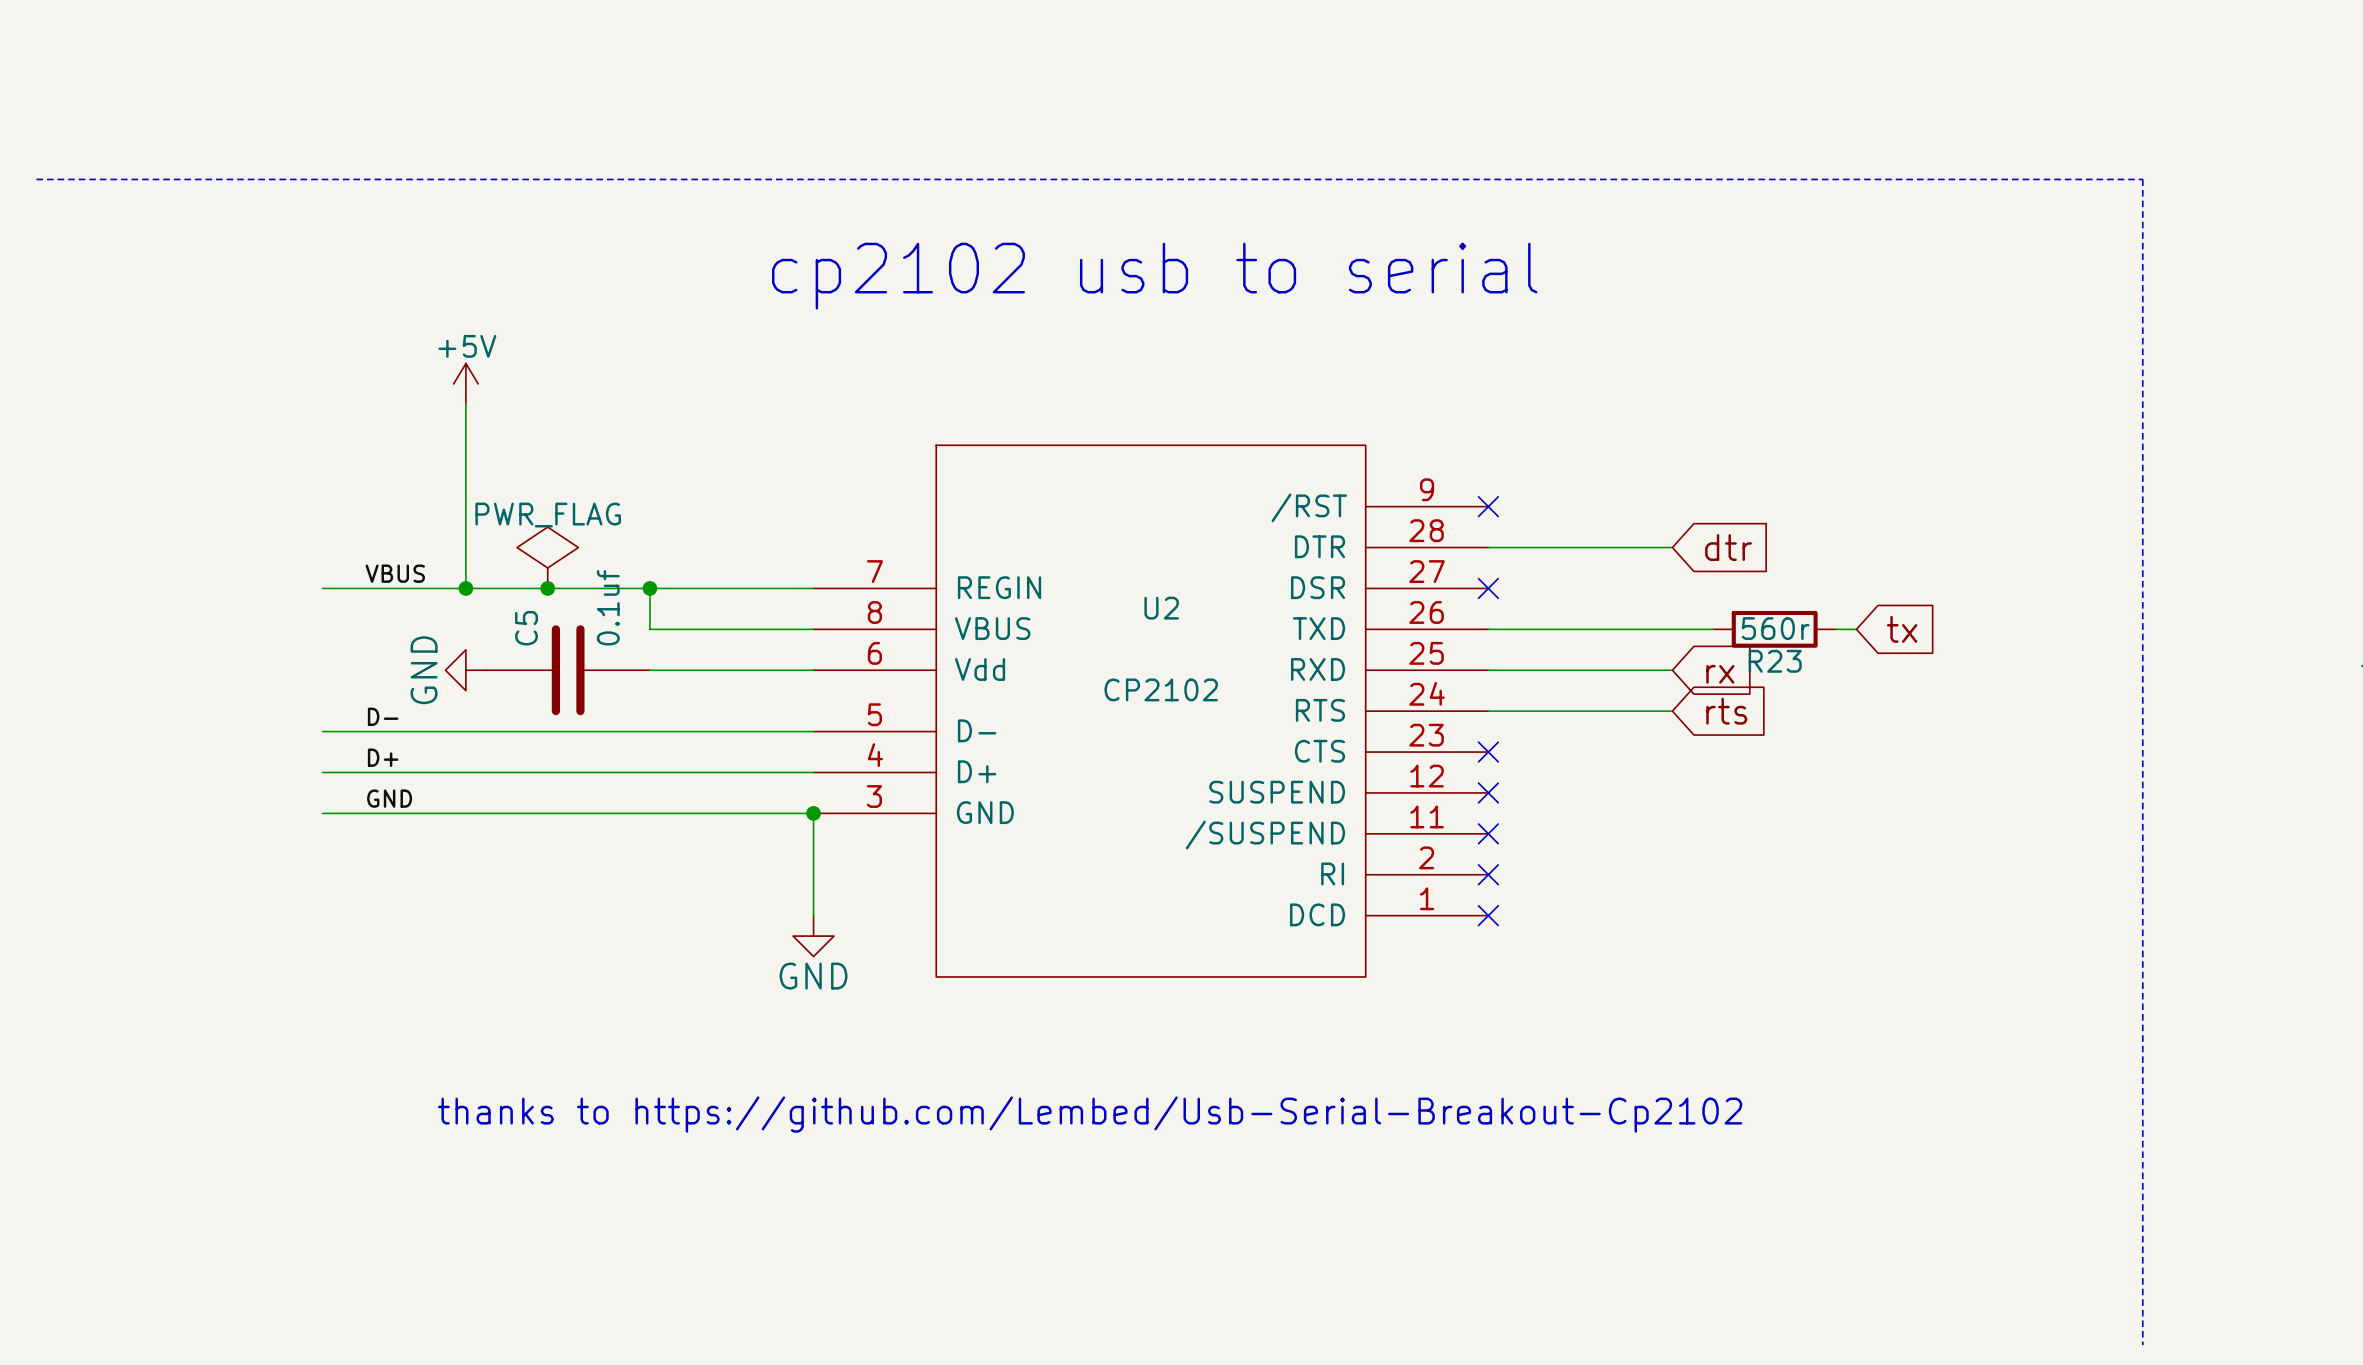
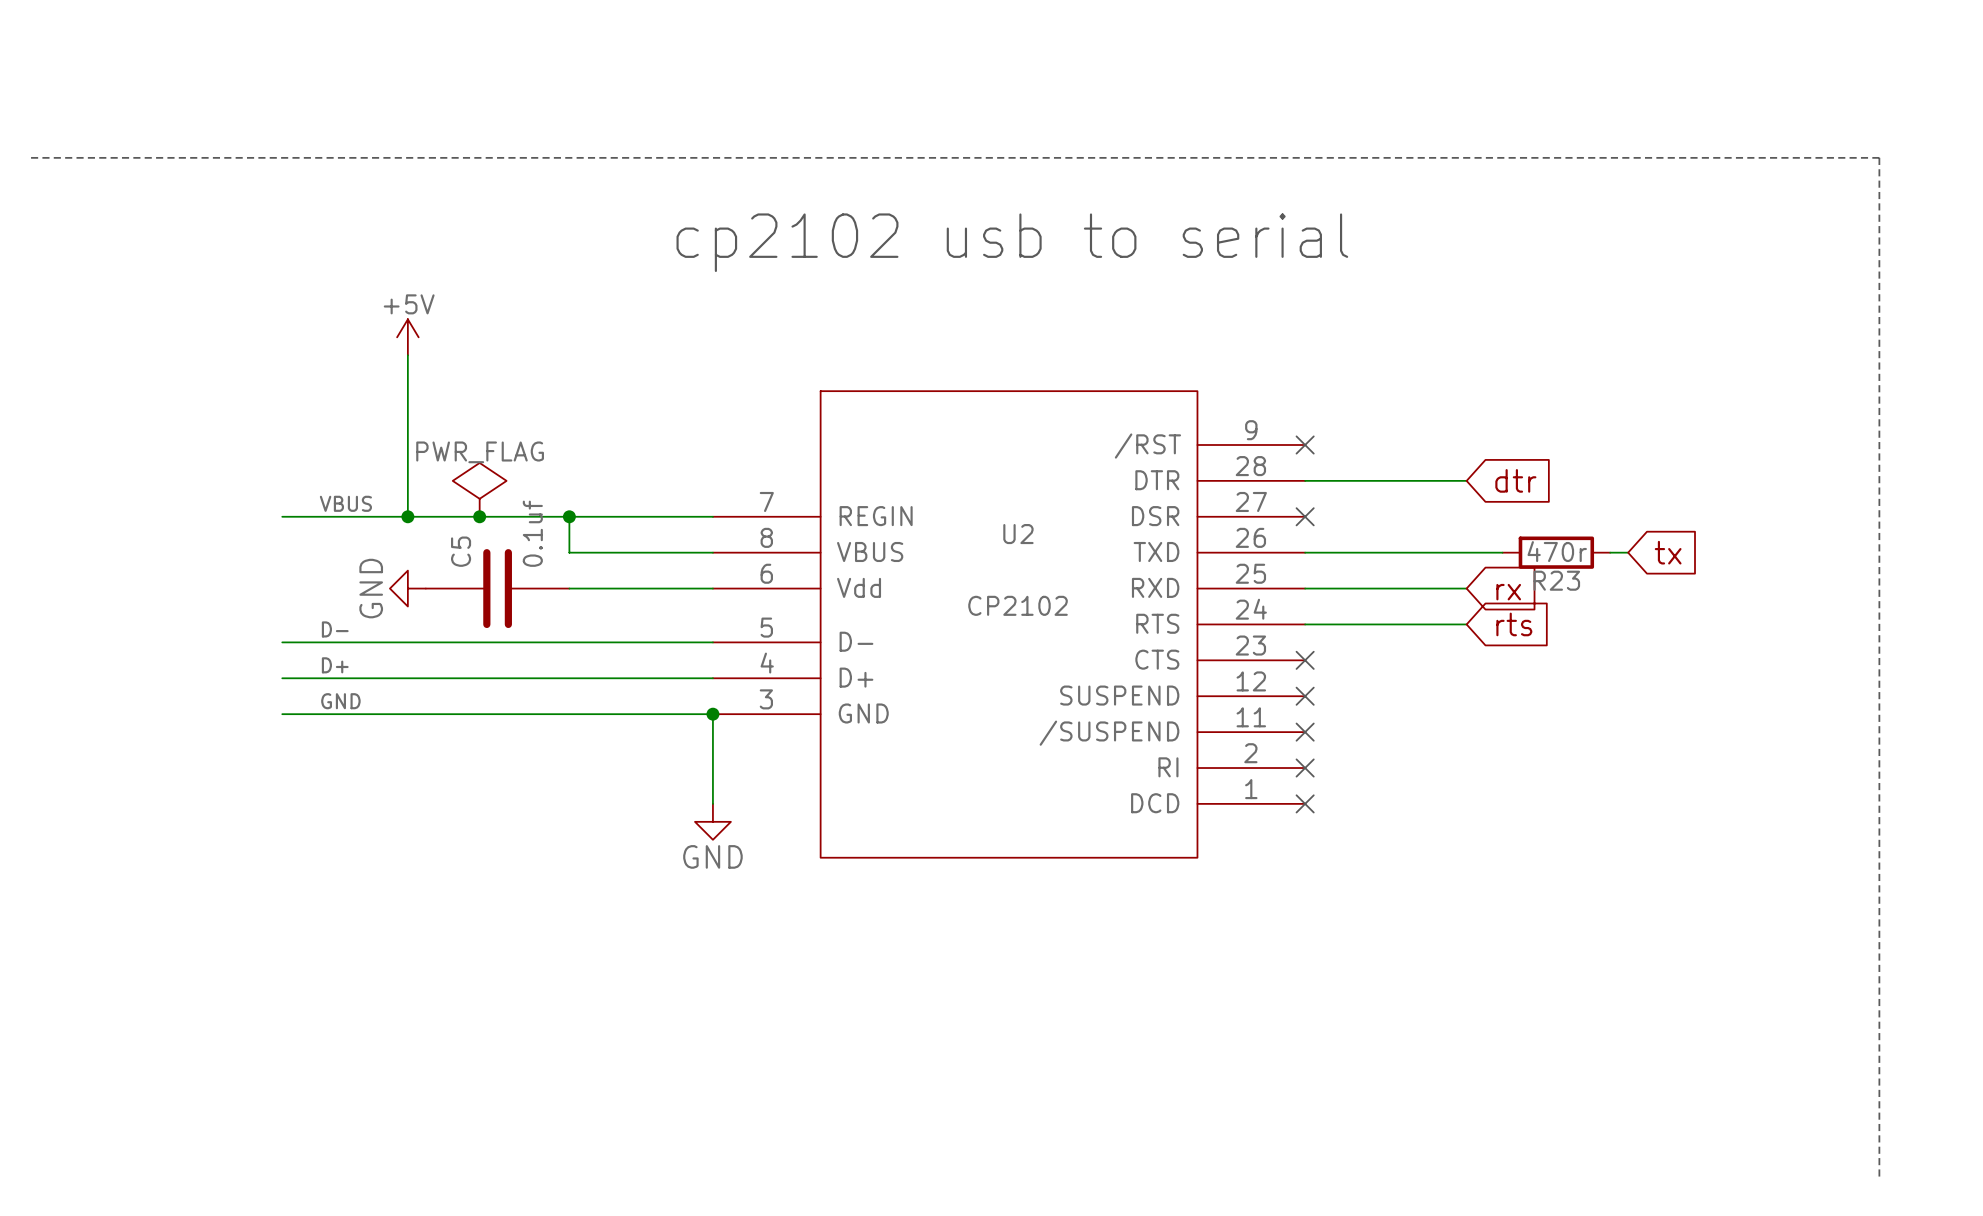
R23 value: 560r (1775, 628) -> 470r (1557, 551)
text: thanks to https://github.com/Lembed/Usb-Serial-Breakout-Cp2102 (1090, 1114) -> none

